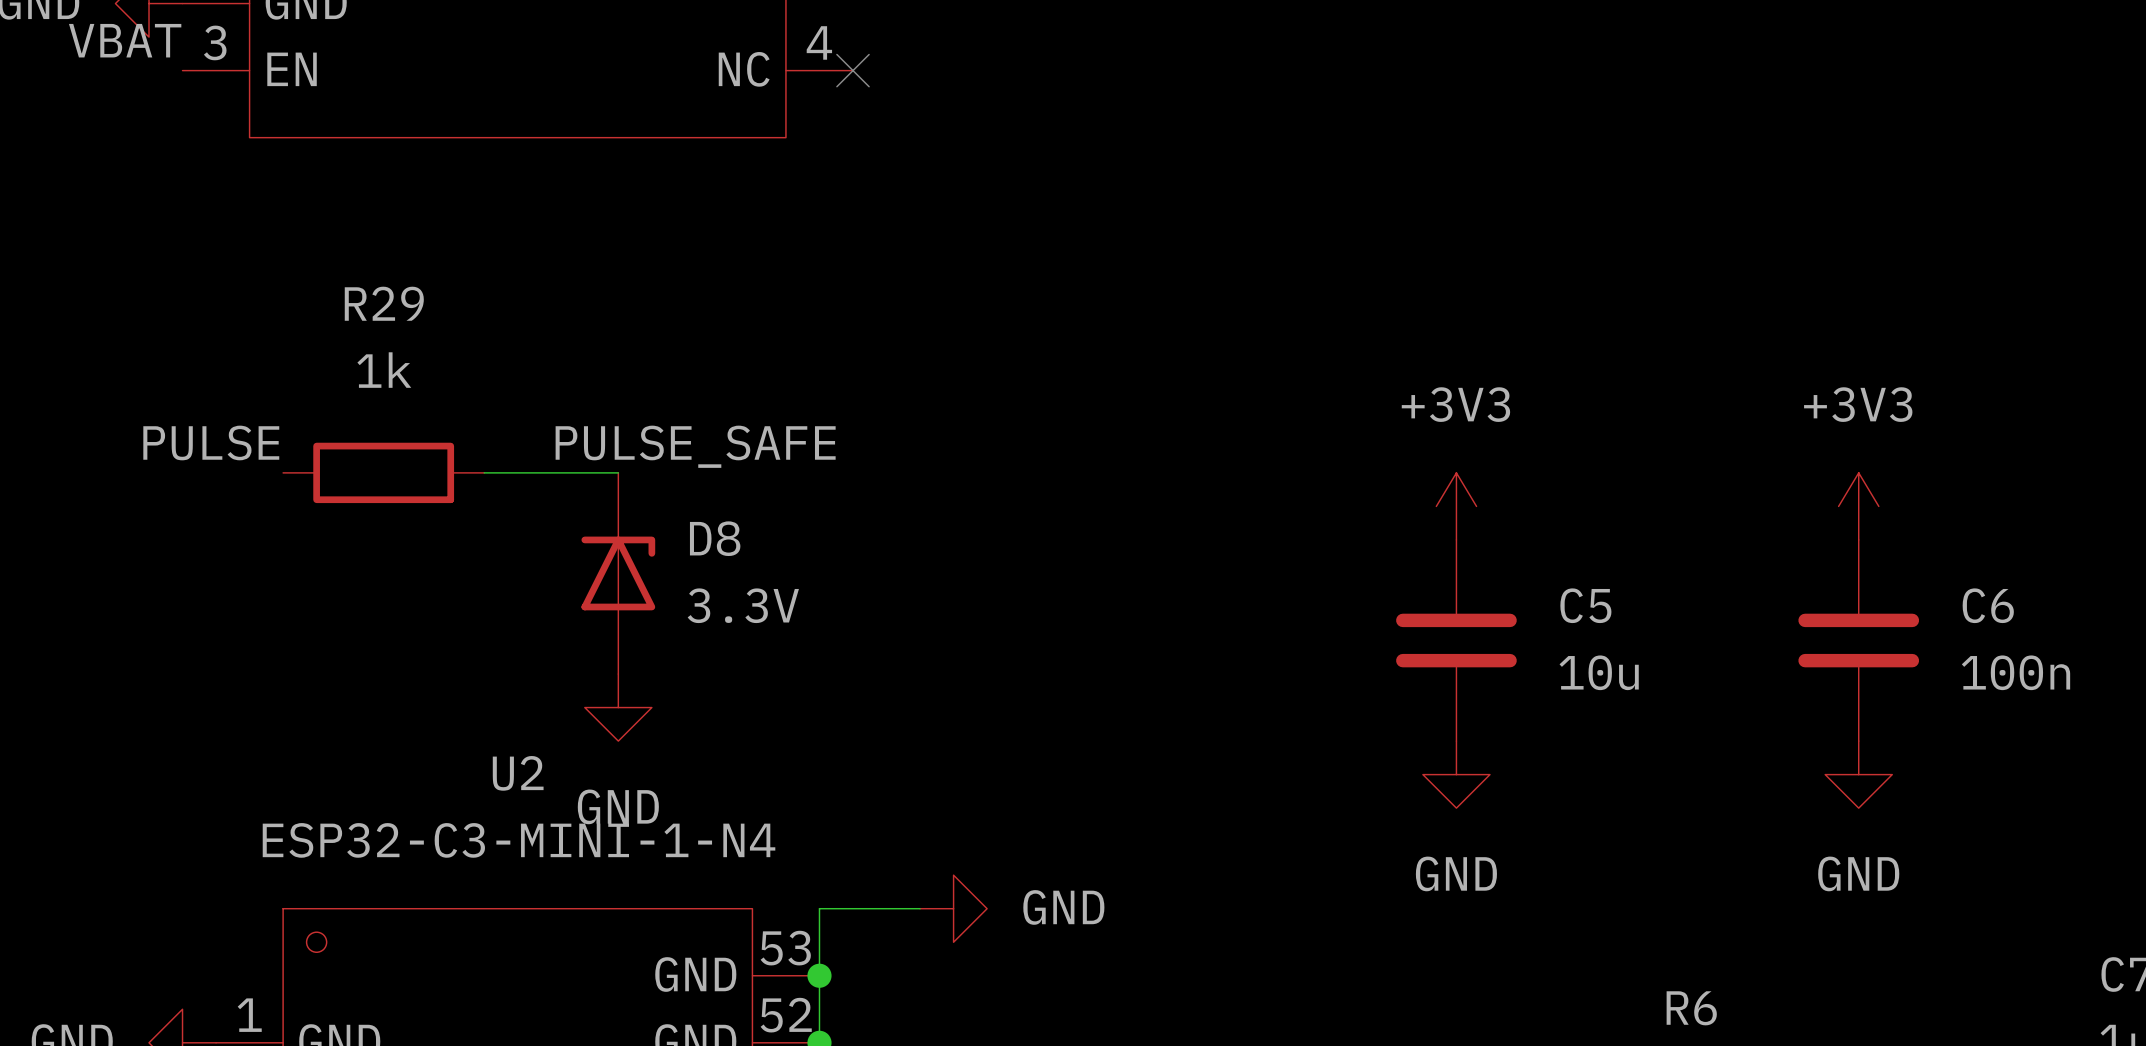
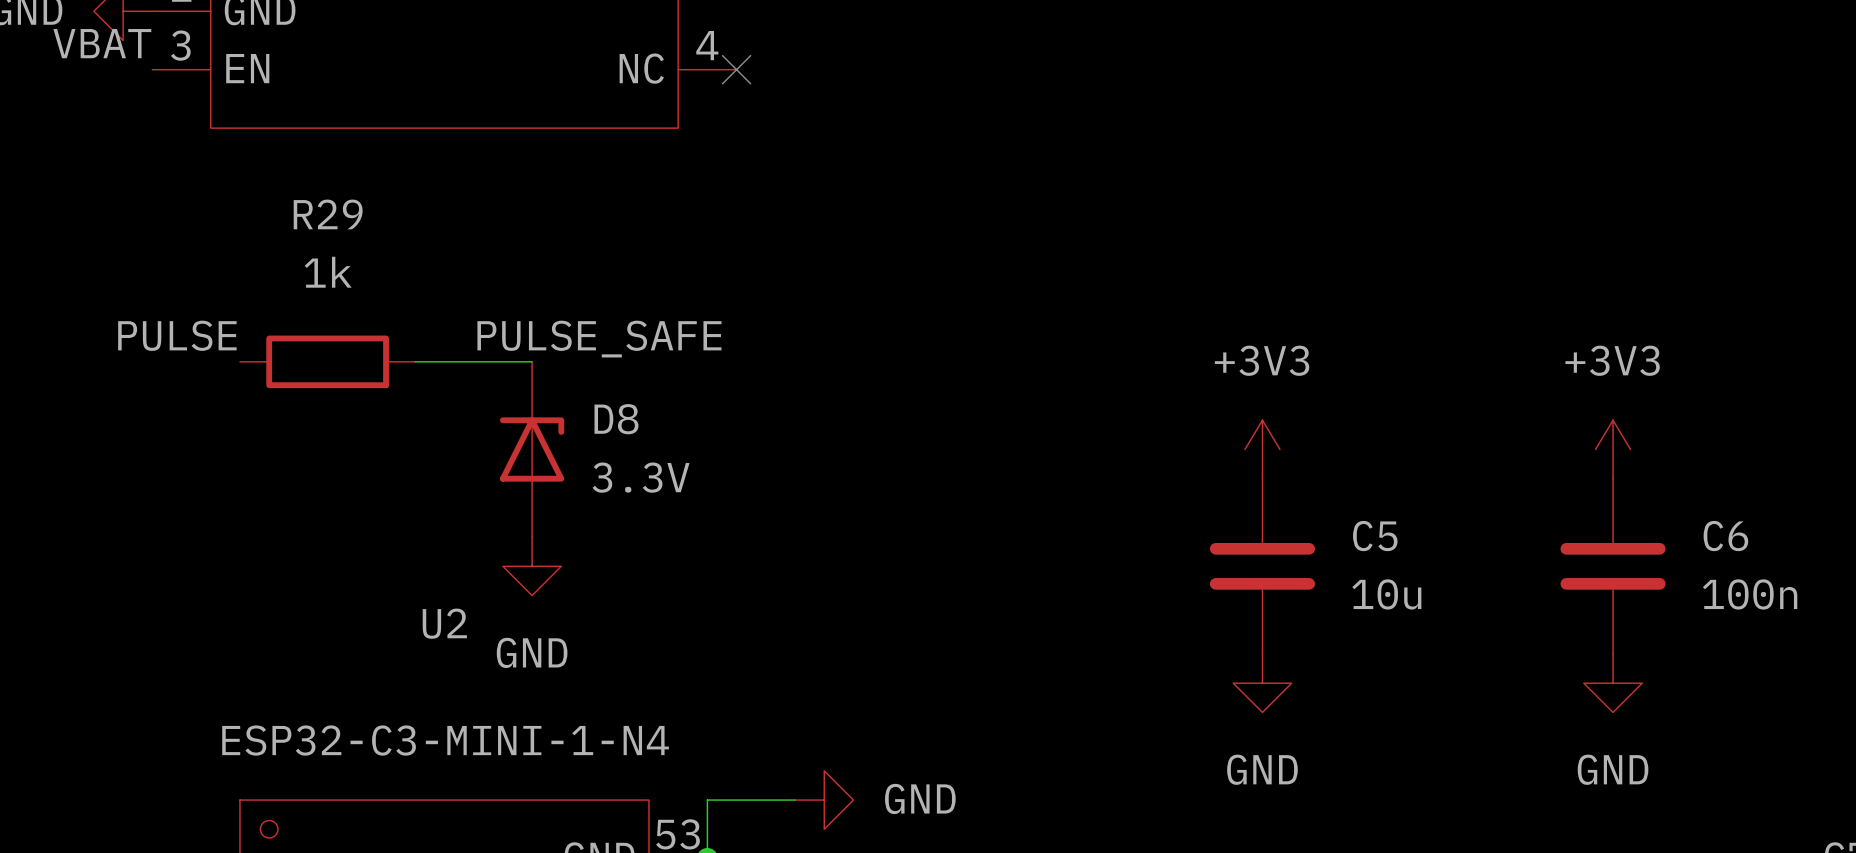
label position: PULSE (211, 442) -> PULSE (177, 335)
label position: PULSE_SAFE (695, 446) -> PULSE_SAFE (599, 339)
R29 position: (383, 472) -> (327, 361)
wire: (484, 472) (618, 472) -> (415, 361) (532, 361)
D8 position: (618, 573) -> (532, 449)
power symbol position: GND (618, 707) -> GND (532, 566)
U2 name position: U2 (518, 773) -> U2 (444, 623)

